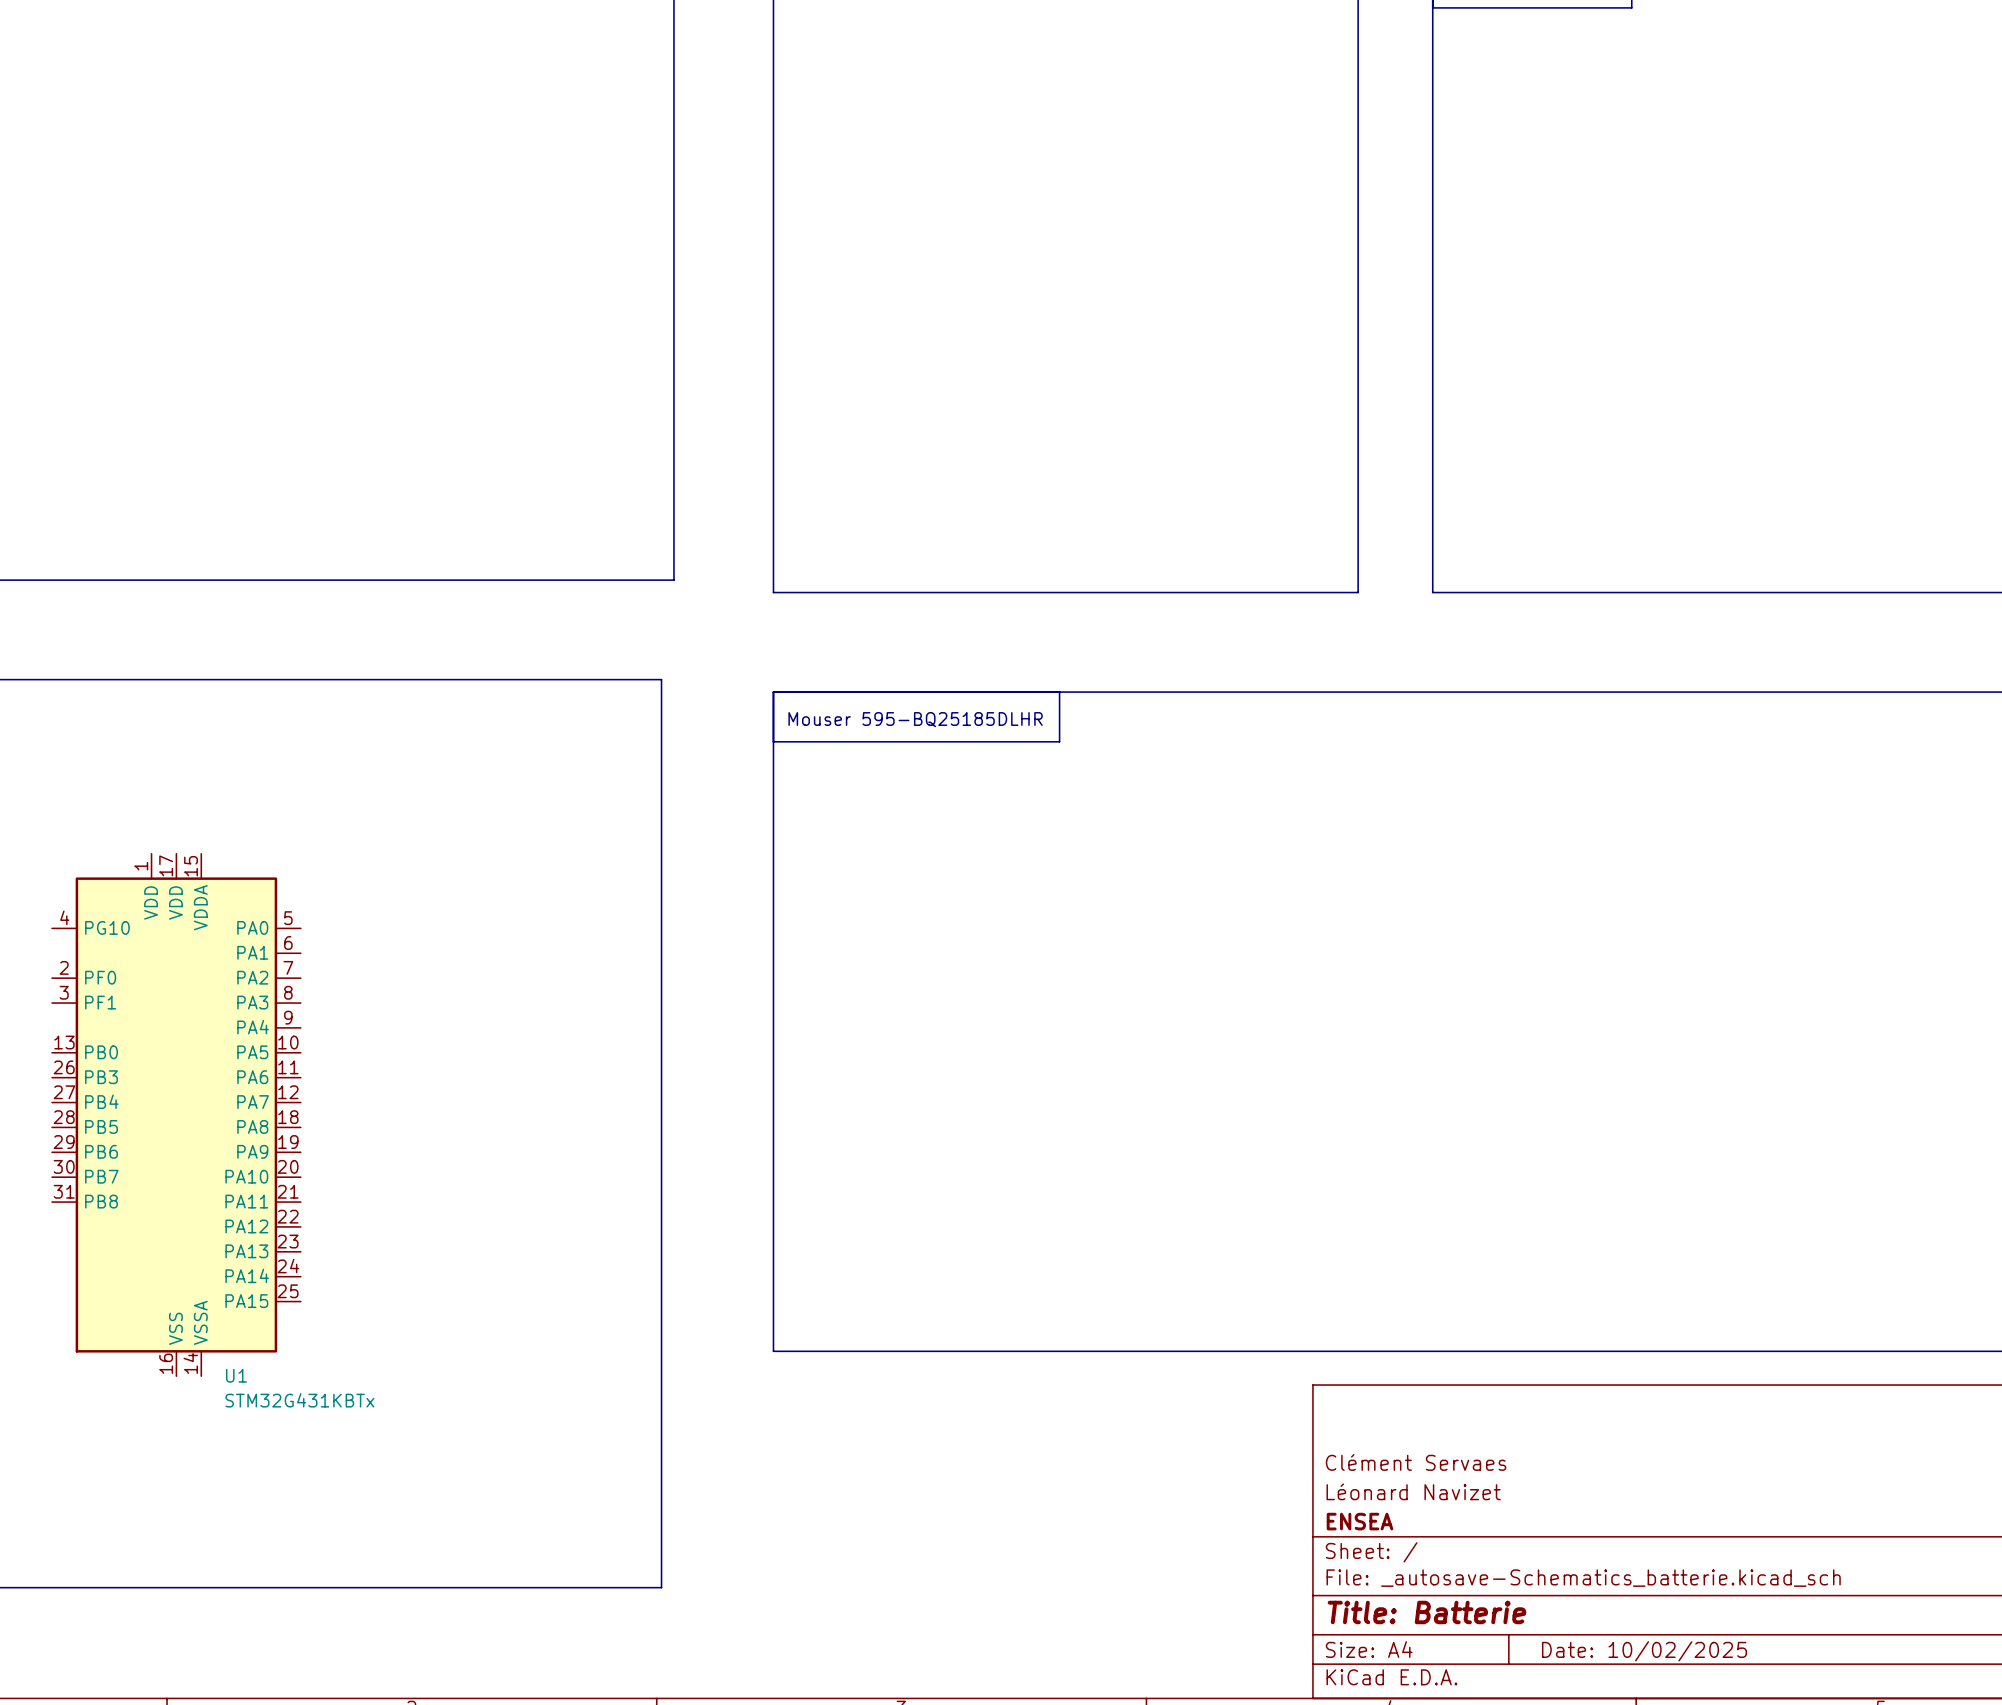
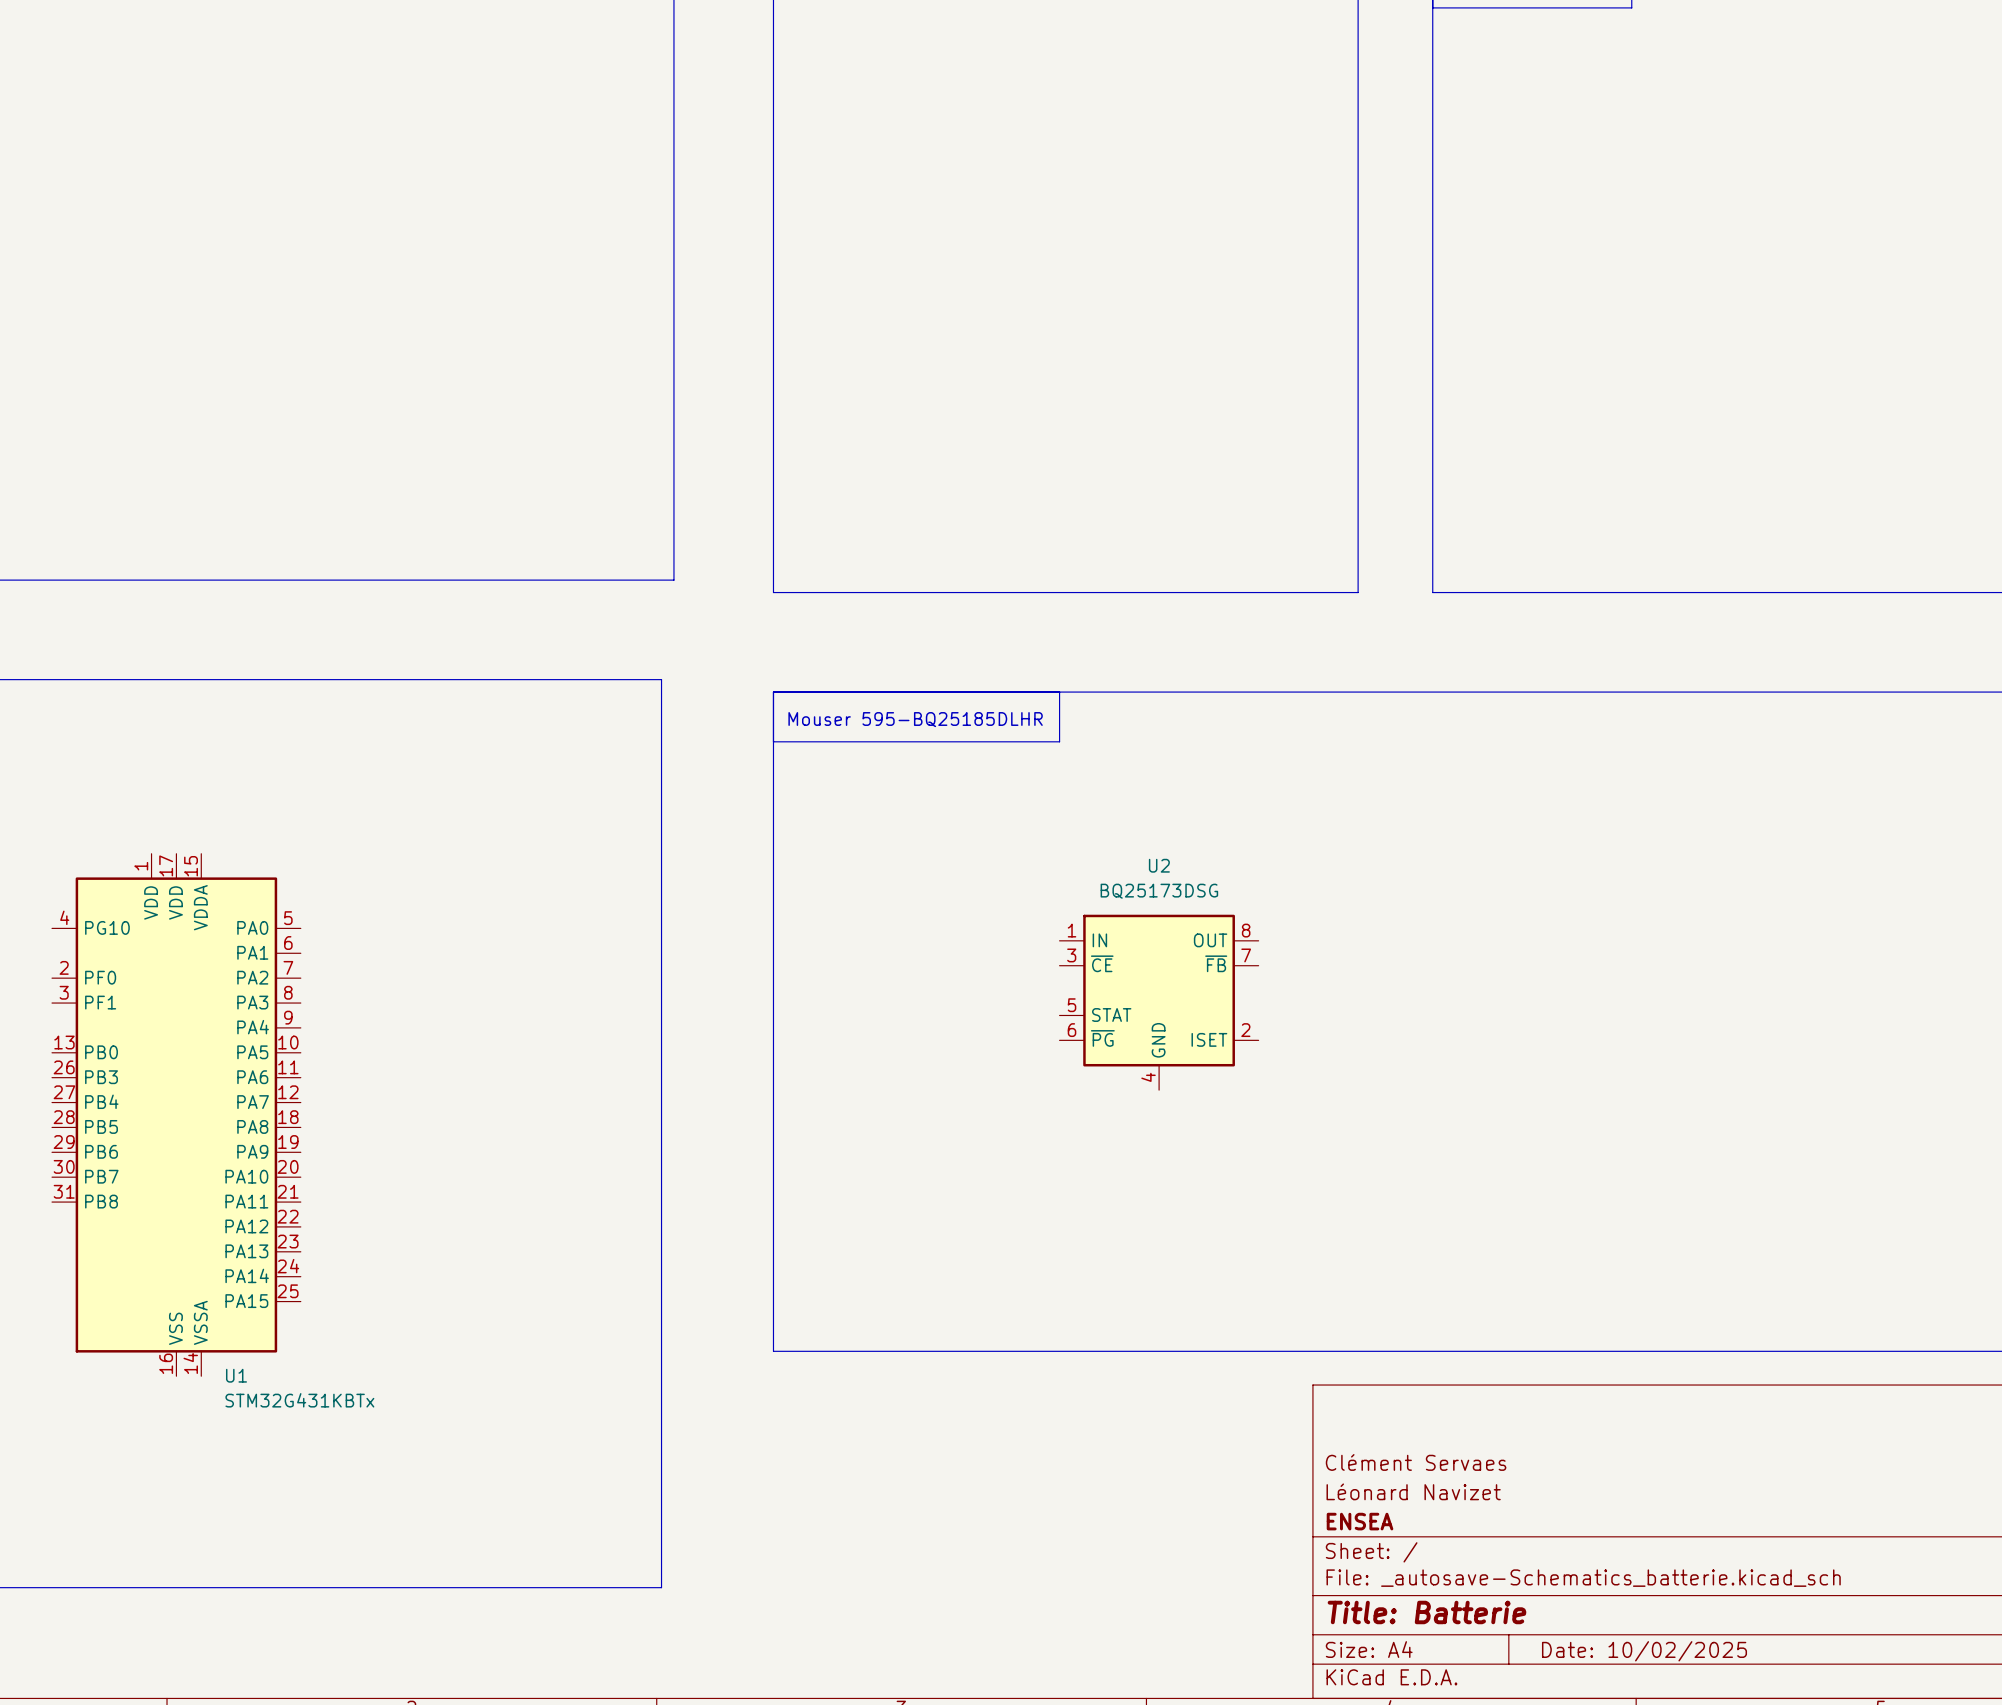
U2: none -> BQ25173DSG (1159, 1002)

